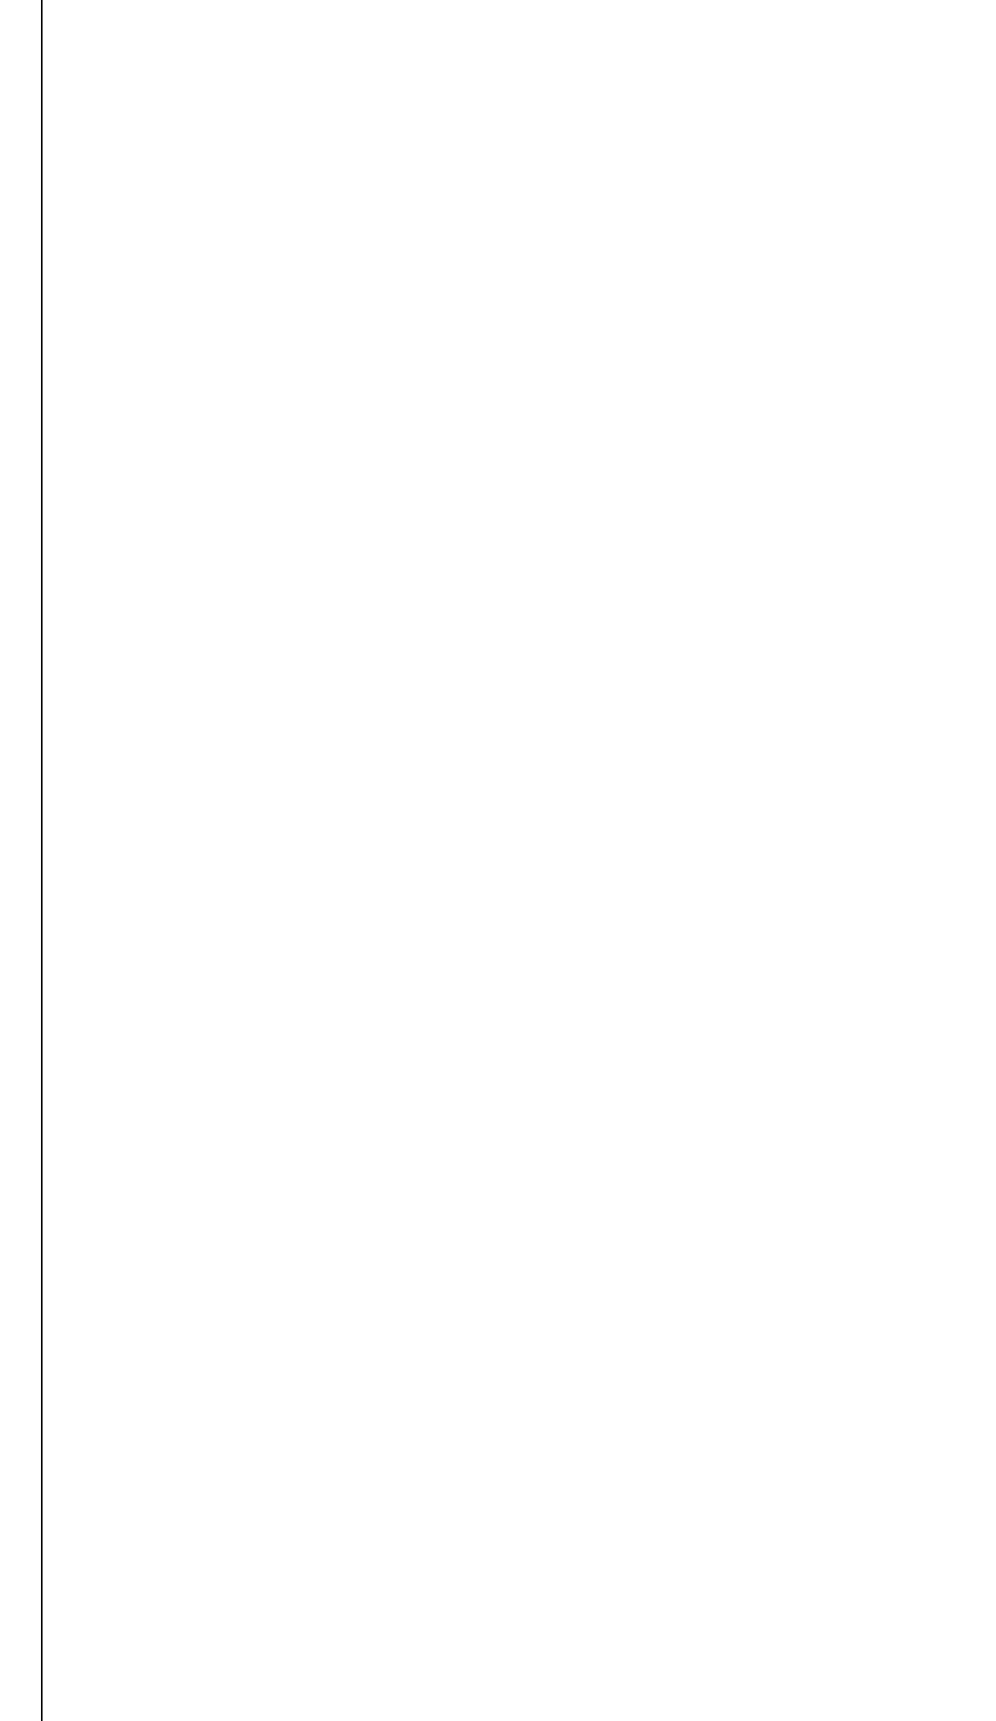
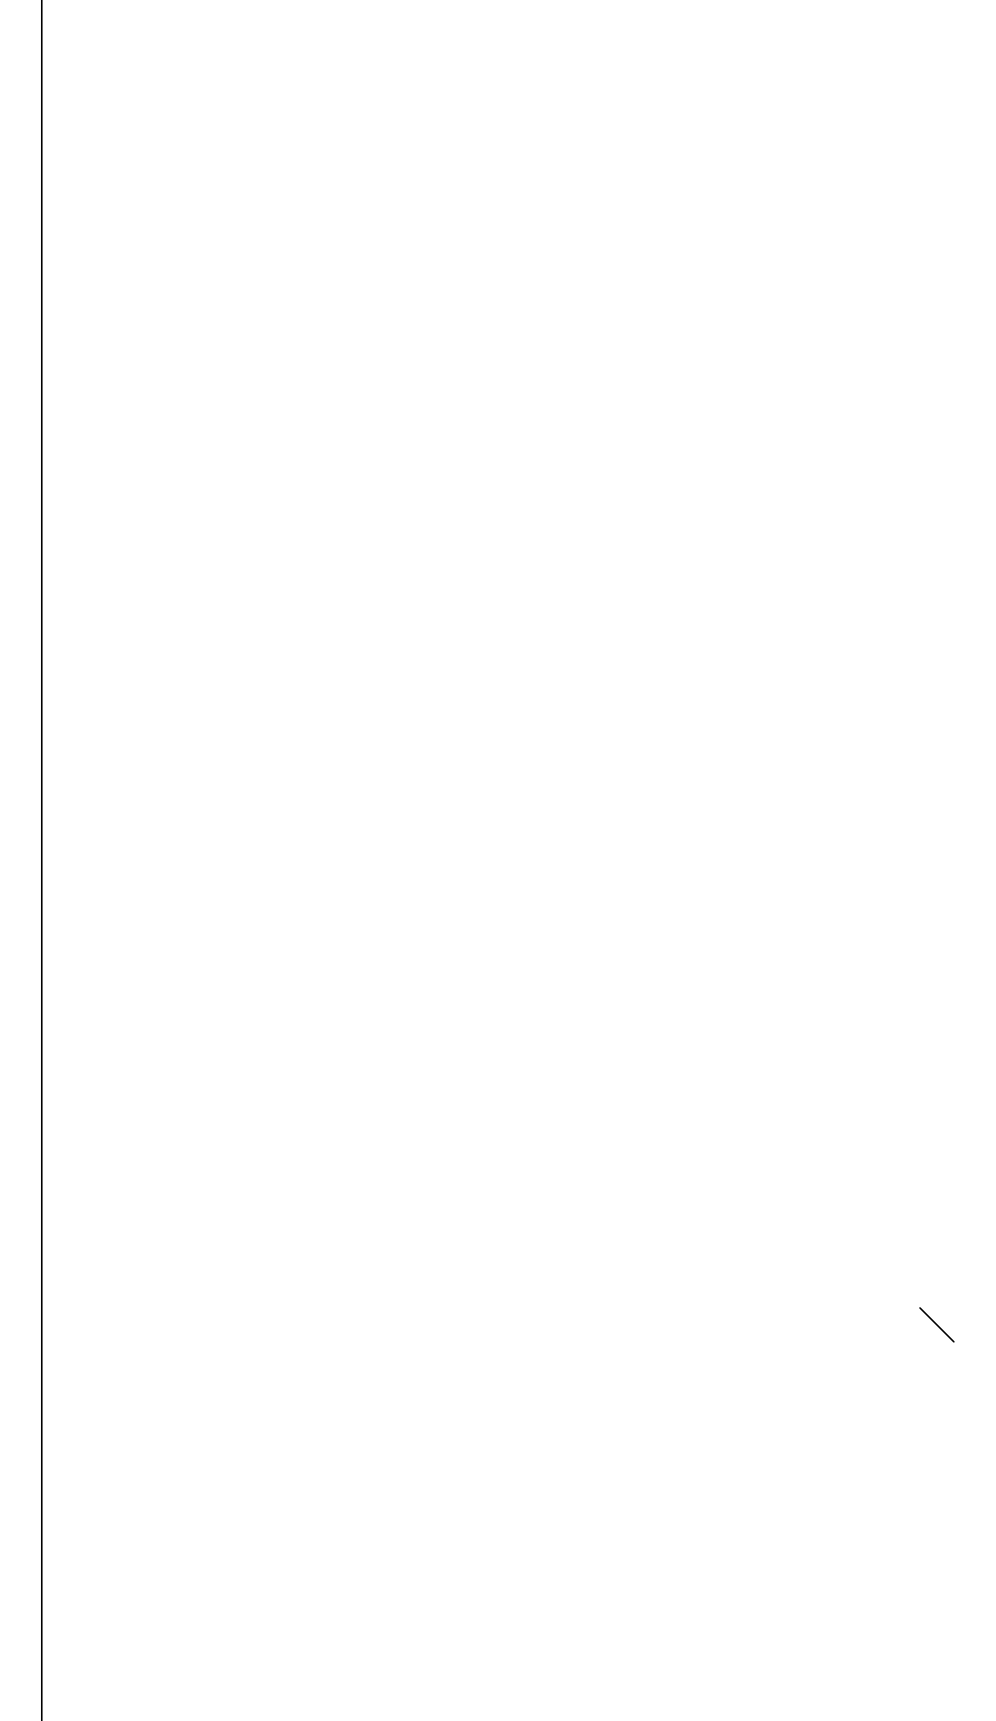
wire: none -> (919, 1307) (953, 1341)

